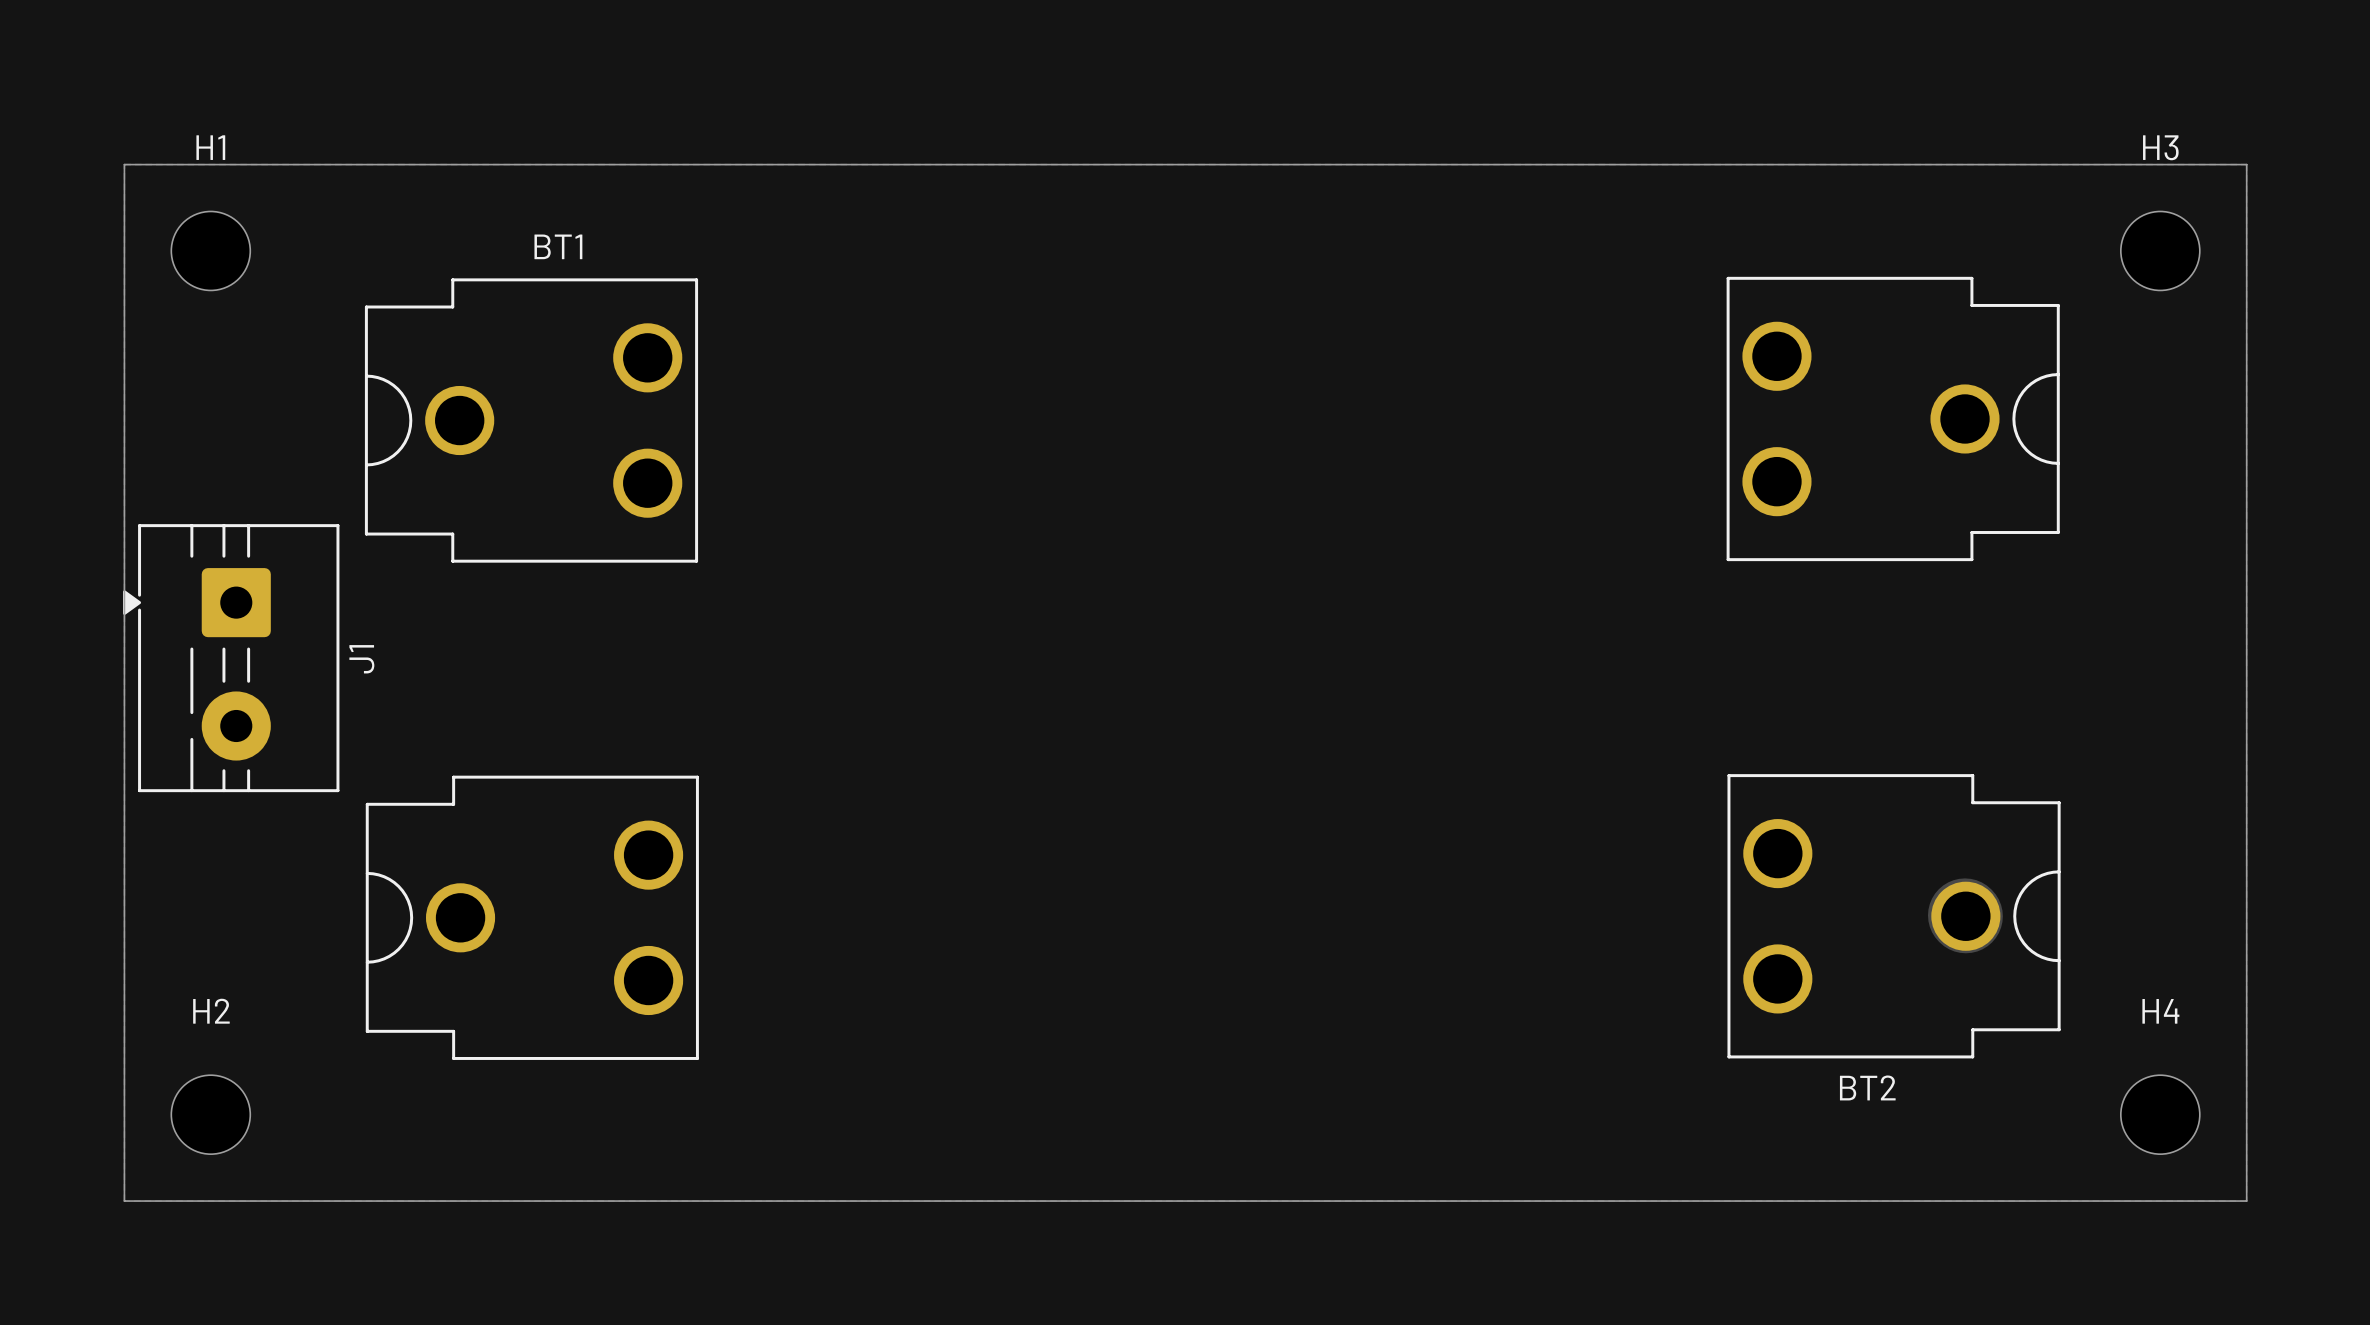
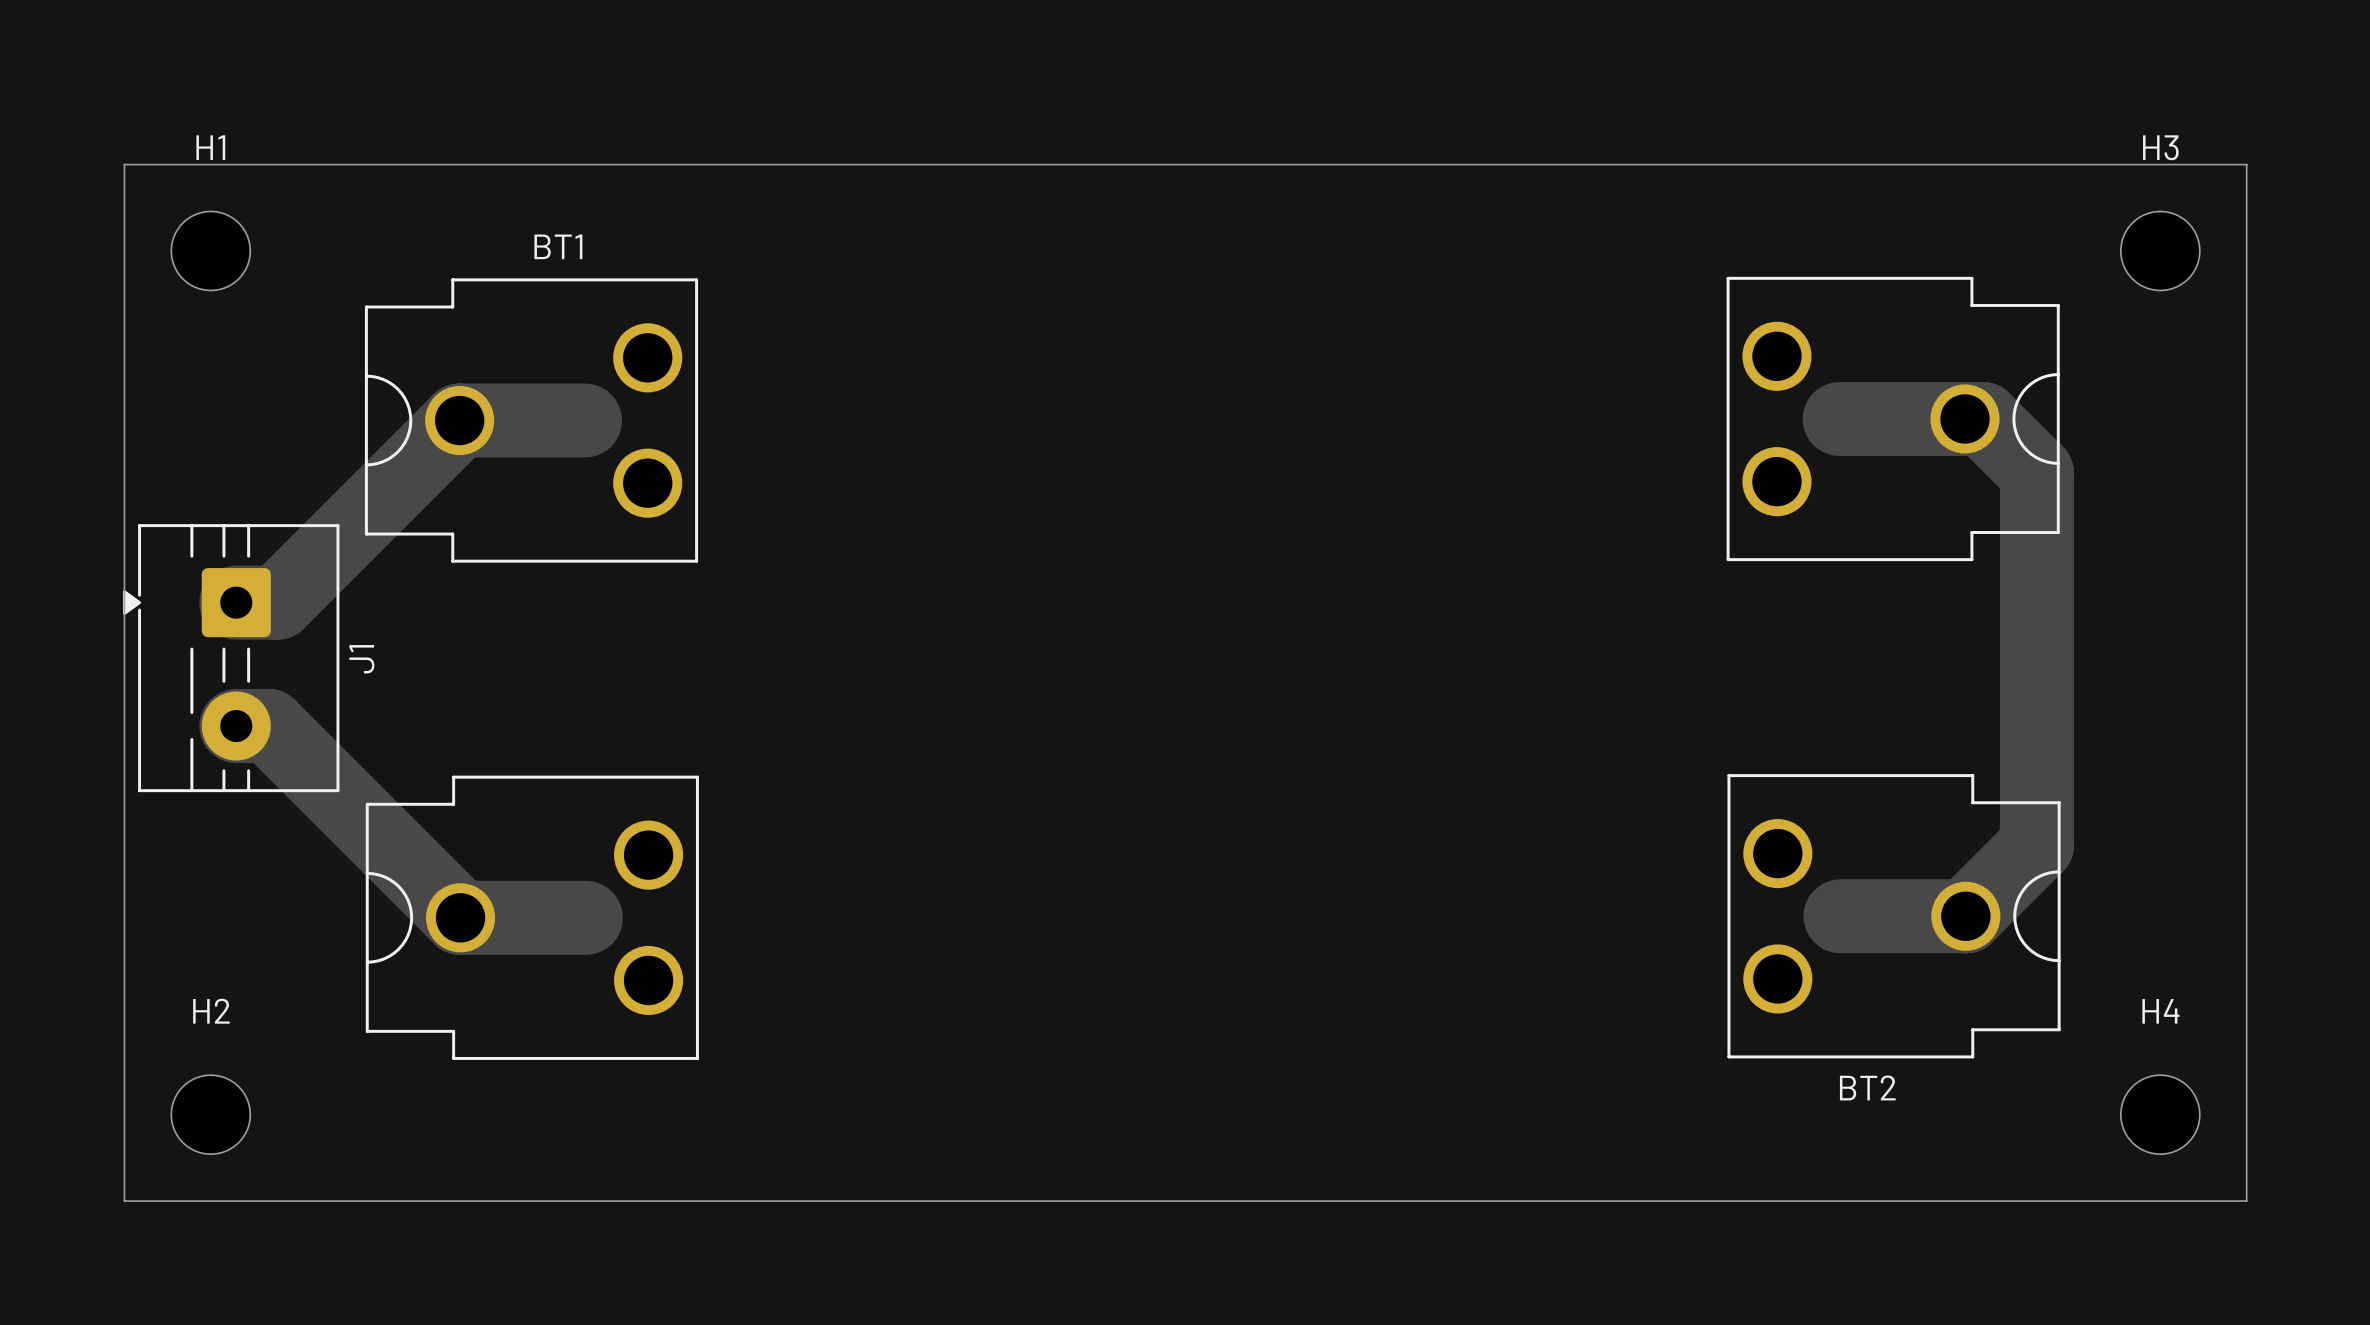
track: none -> (1839, 418) (1982, 418) (2036, 473) (2036, 845) (1965, 916) (1840, 916)
track: none -> (585, 420) (459, 420) (277, 602) (236, 602)
track: none -> (236, 726) (268, 726) (460, 917) (585, 917)

